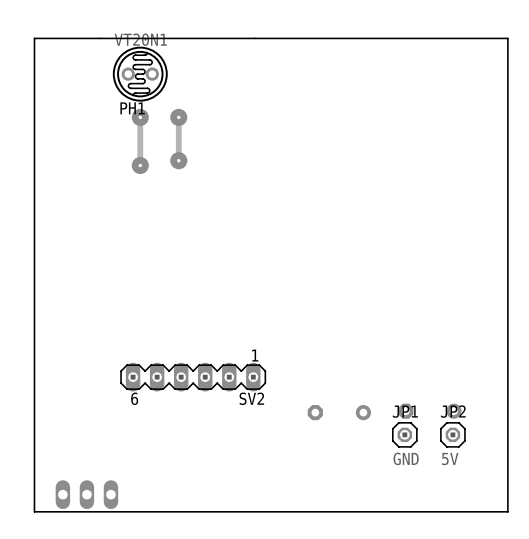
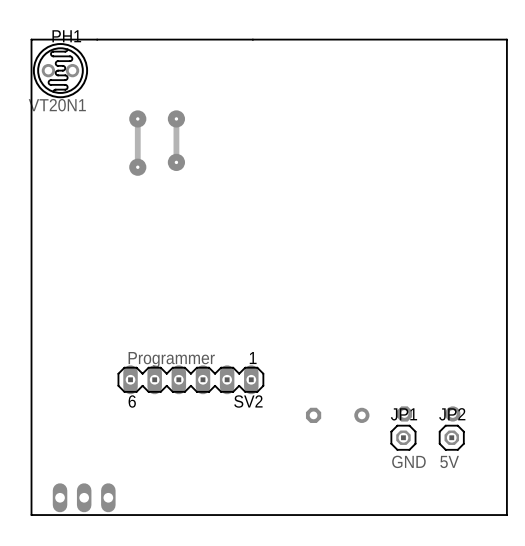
PH1 rotation: 0° (140, 74) -> 180° (60, 70)
PH1 position: (140, 74) -> (60, 70)
SV2 value: none -> Programmer (171, 359)

